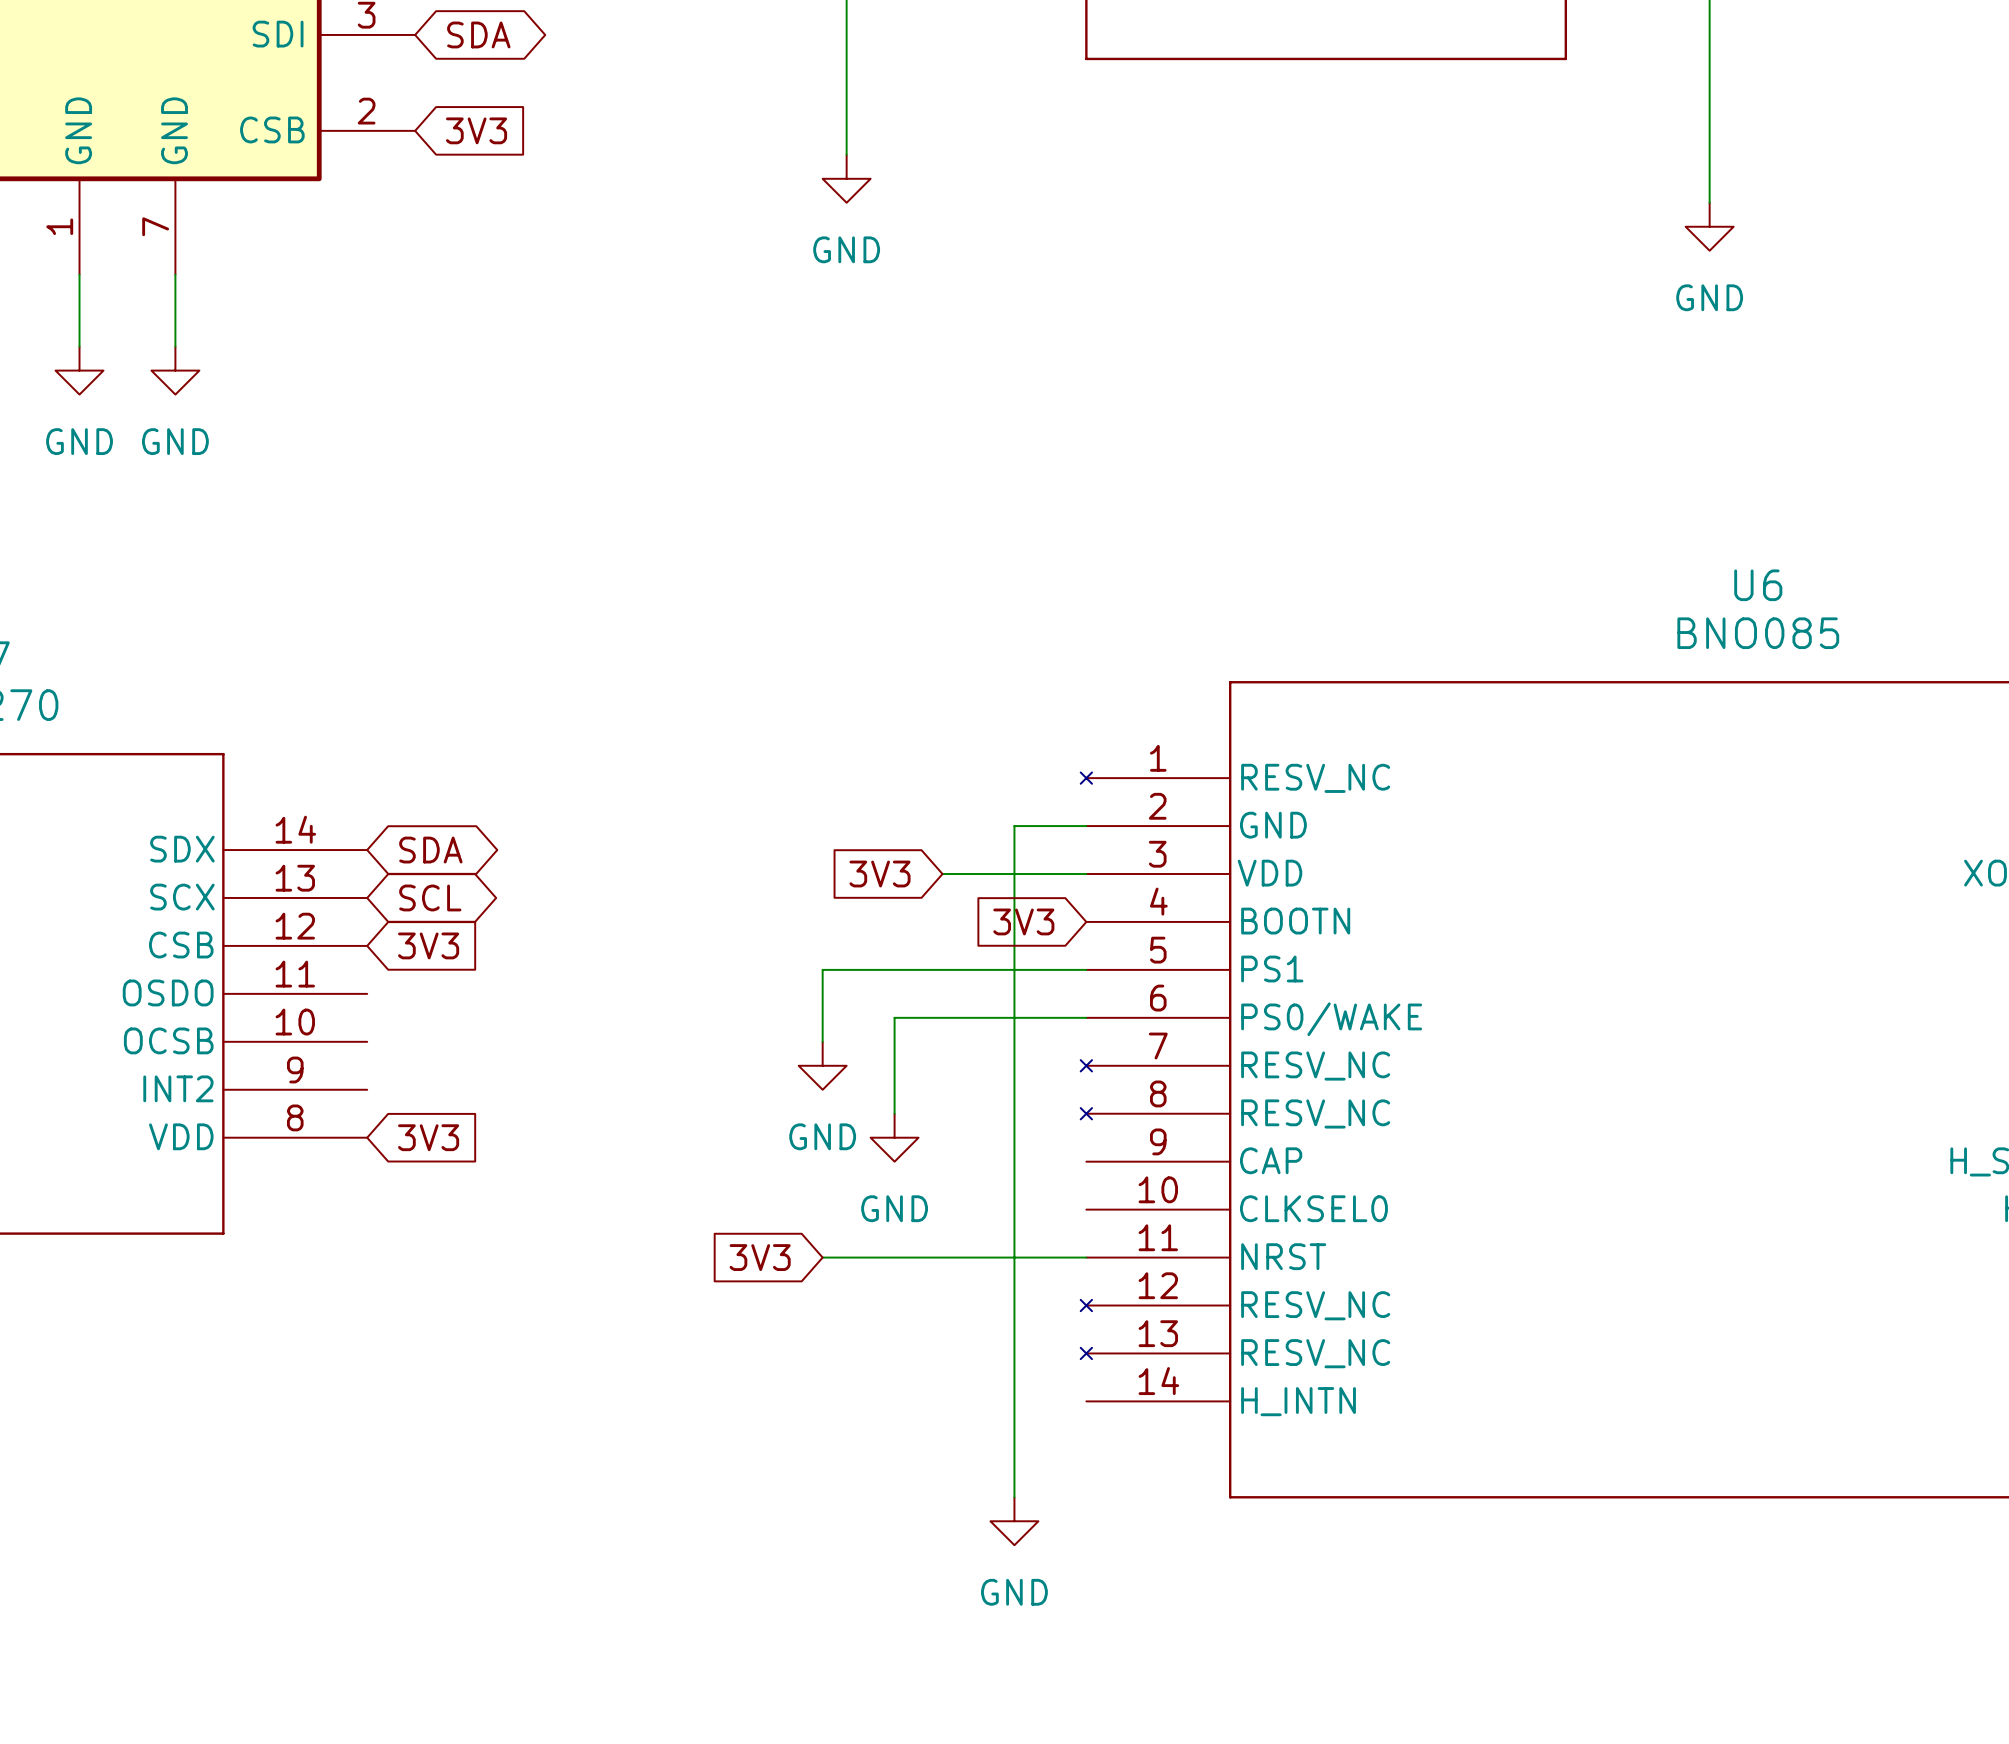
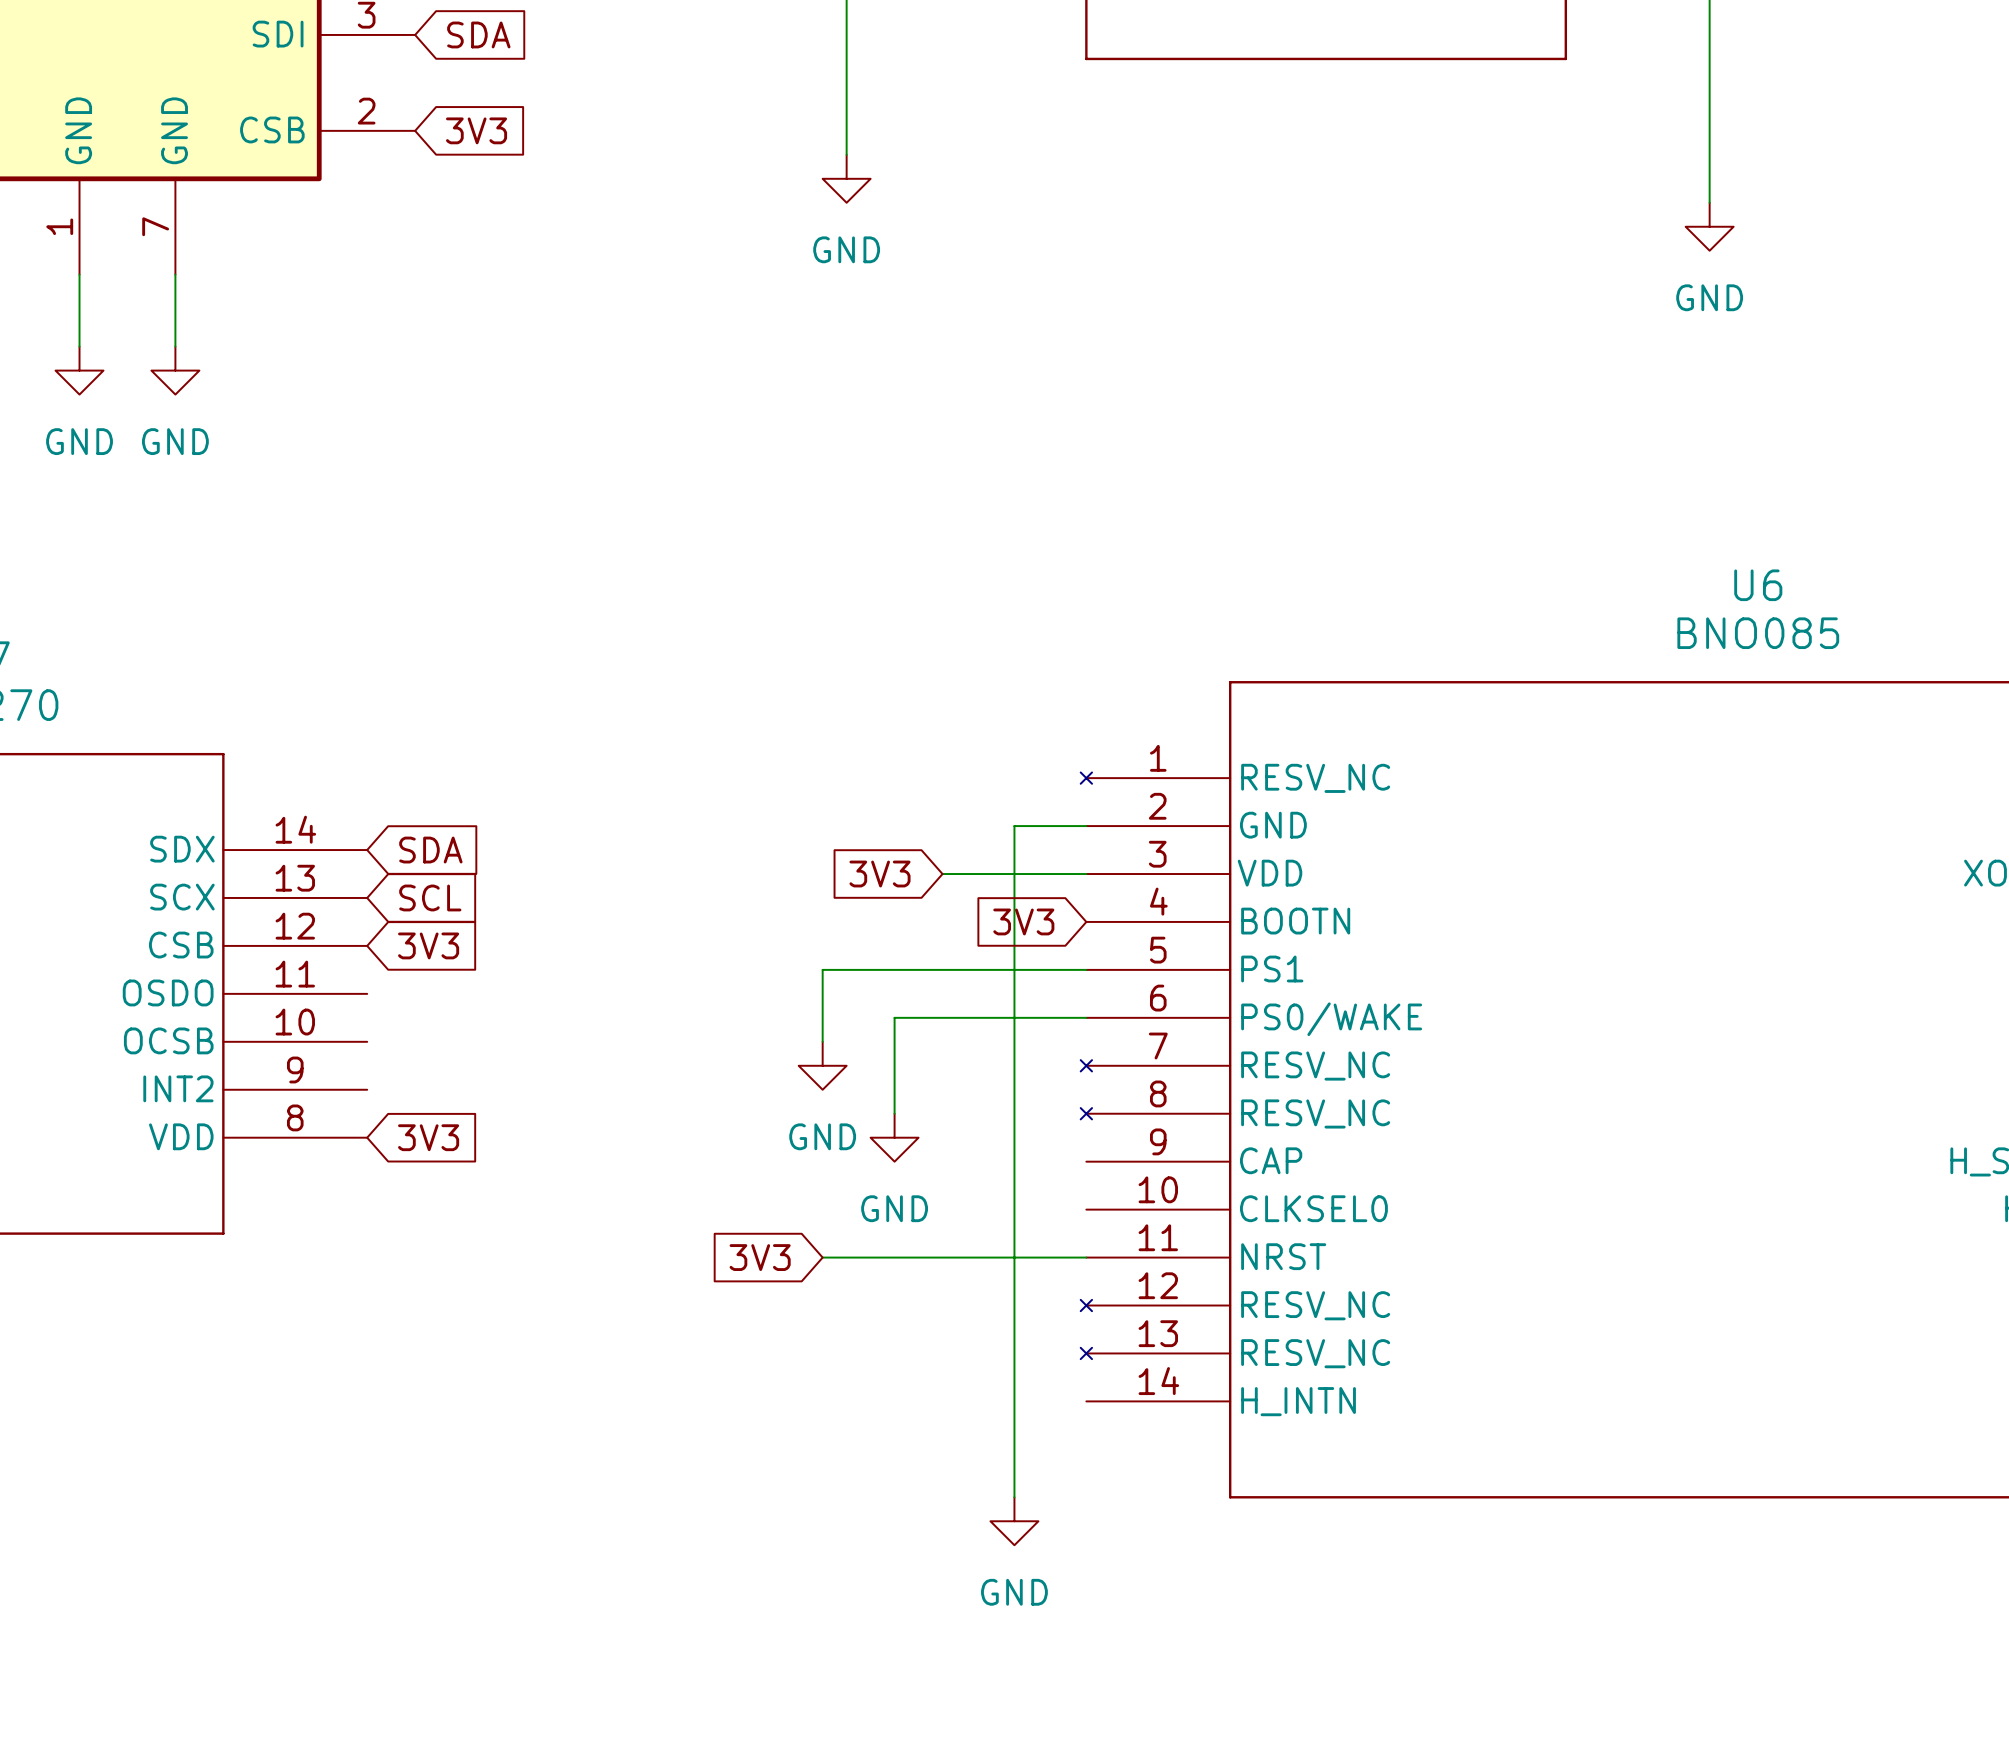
global label shape: bidirectional (478, 34) -> input (478, 34)
global label shape: bidirectional (430, 850) -> input (430, 850)
global label shape: bidirectional (430, 897) -> input (430, 897)

